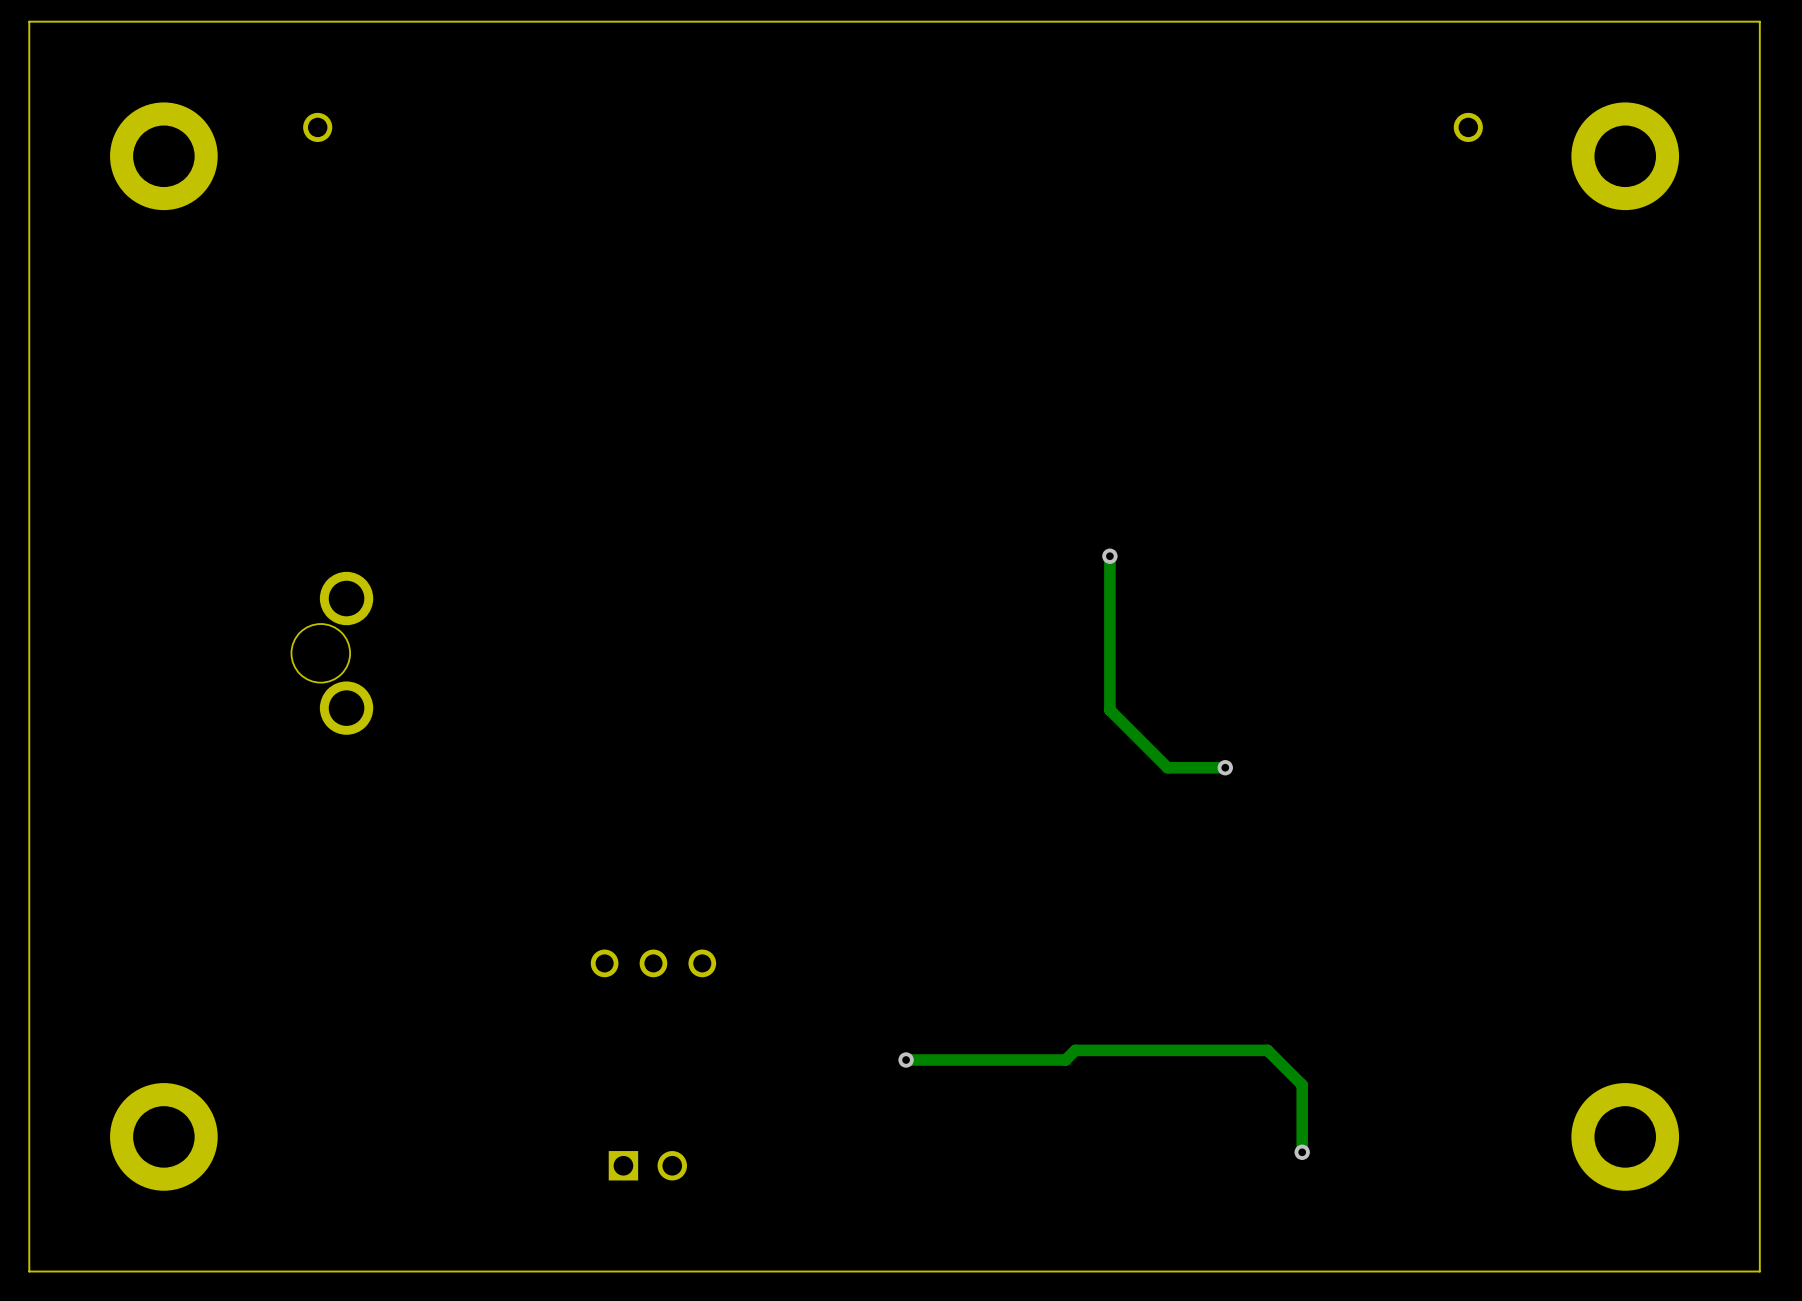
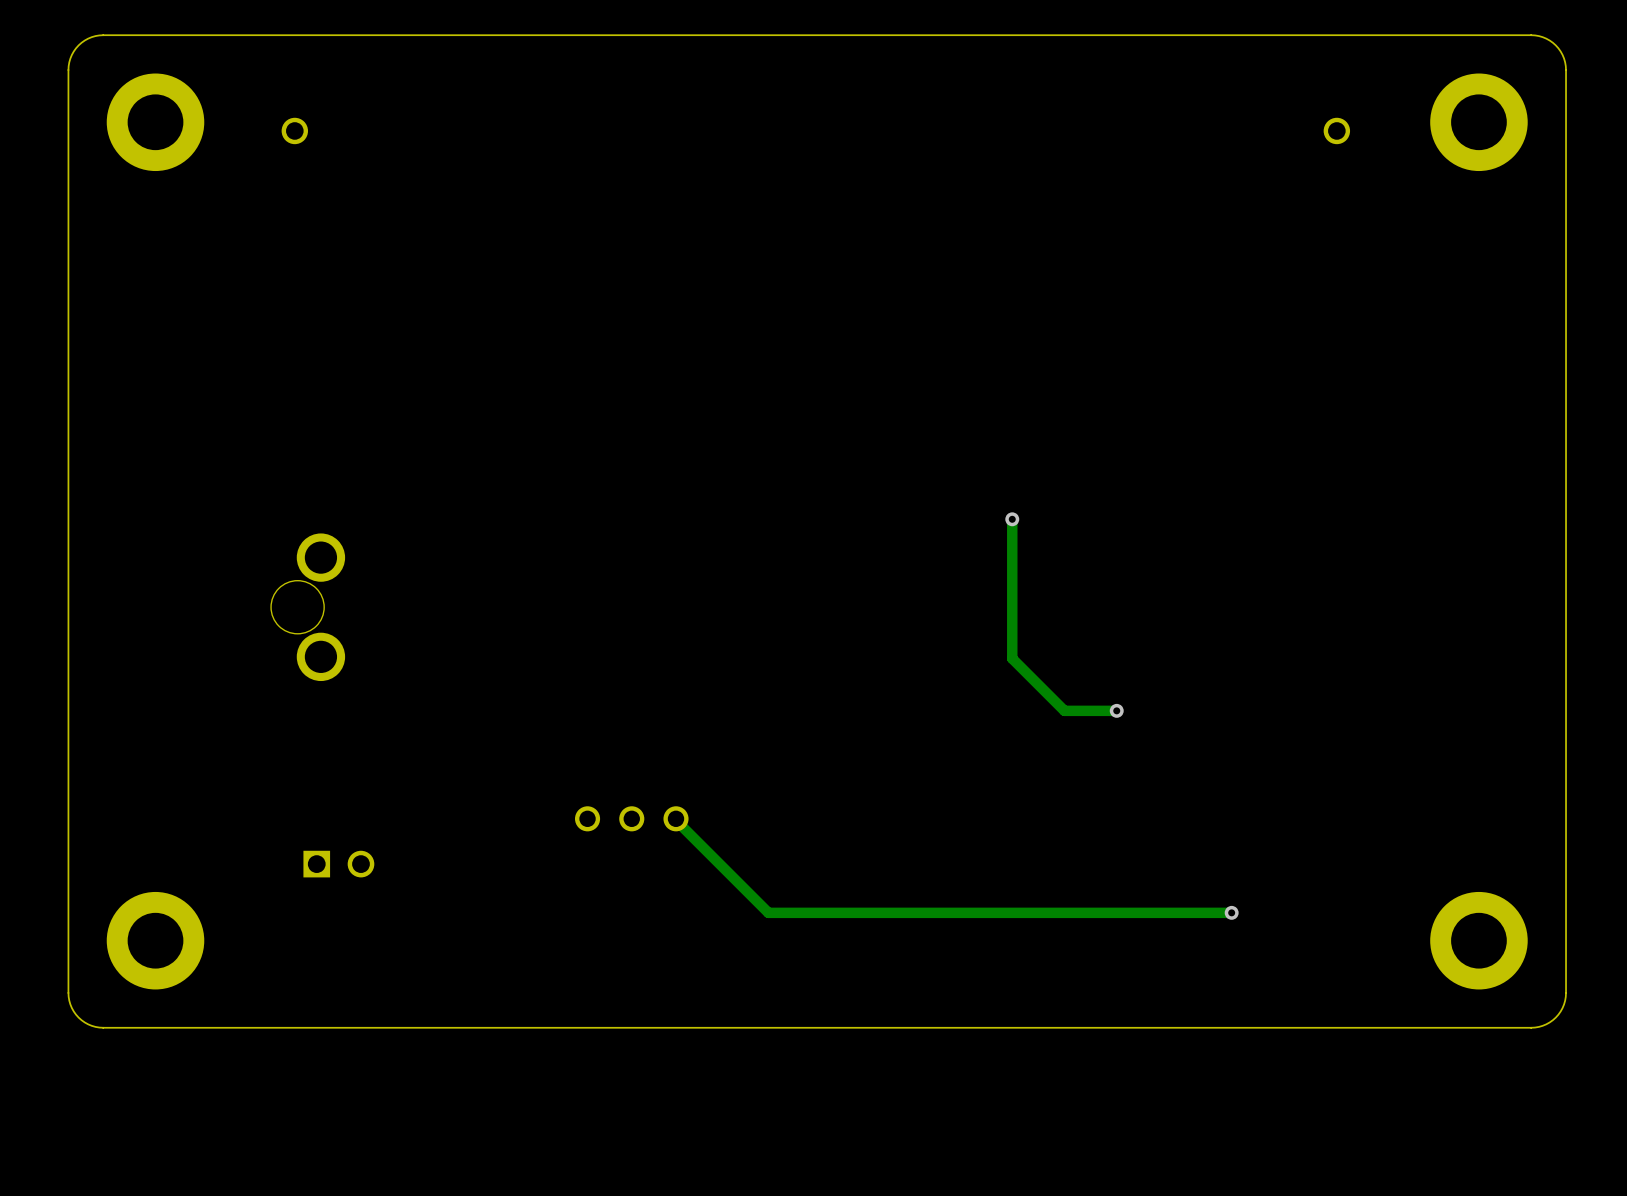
board edge: (1682, 21) (1759, 21) (1759, 1271) (29, 1271) (29, 21) (106, 21) -> (1531, 35) (1546, 38) (1555, 45) (1562, 54) (1566, 70) (1566, 992) (1562, 1008) (1555, 1017) (1542, 1025) (1531, 1027) (103, 1027) (84, 1022) (71, 1008) (68, 992) (68, 70) (70, 58) (78, 45) (91, 37) (103, 35)
part position: (163, 156) -> (155, 122)
part position: (1625, 156) -> (1478, 122)
track: none -> (676, 818) (768, 912) (1231, 912)
part position: (653, 963) -> (631, 818)
via: none -> (1231, 912)
track: (906, 1060) (1065, 1060) (1075, 1050) (1267, 1050) (1302, 1084) (1302, 1152) -> none
via: (906, 1060) -> none
part position: (163, 1136) -> (155, 940)
part position: (1625, 1136) -> (1478, 940)
via: (1302, 1152) -> none
part position: (647, 1165) -> (338, 864)

